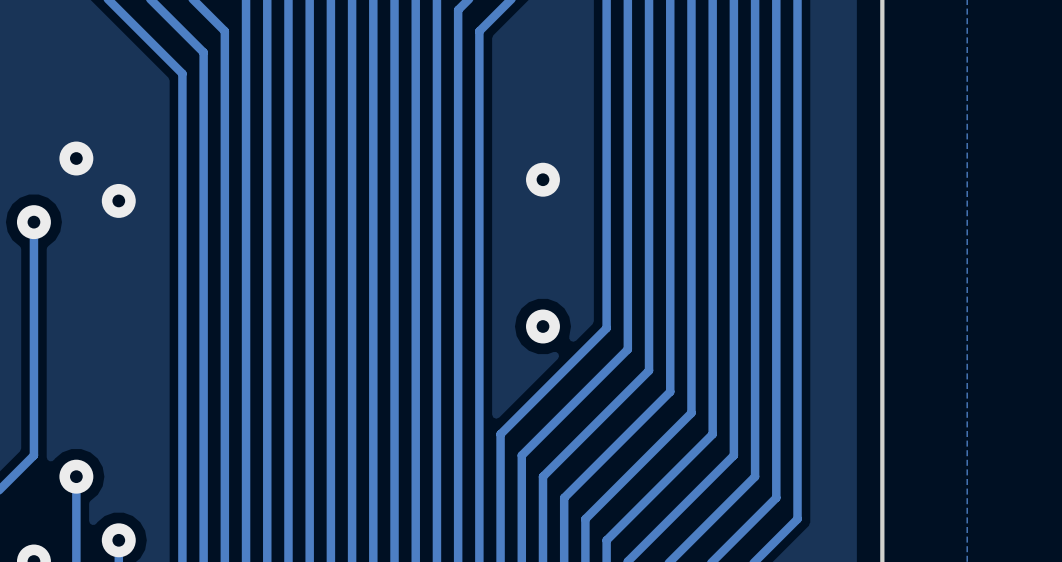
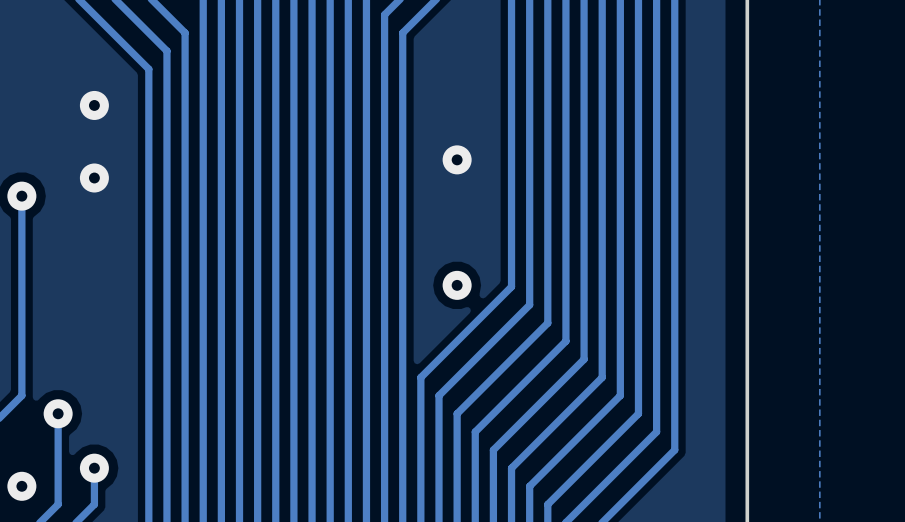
via position: (76, 158) -> (94, 105)

